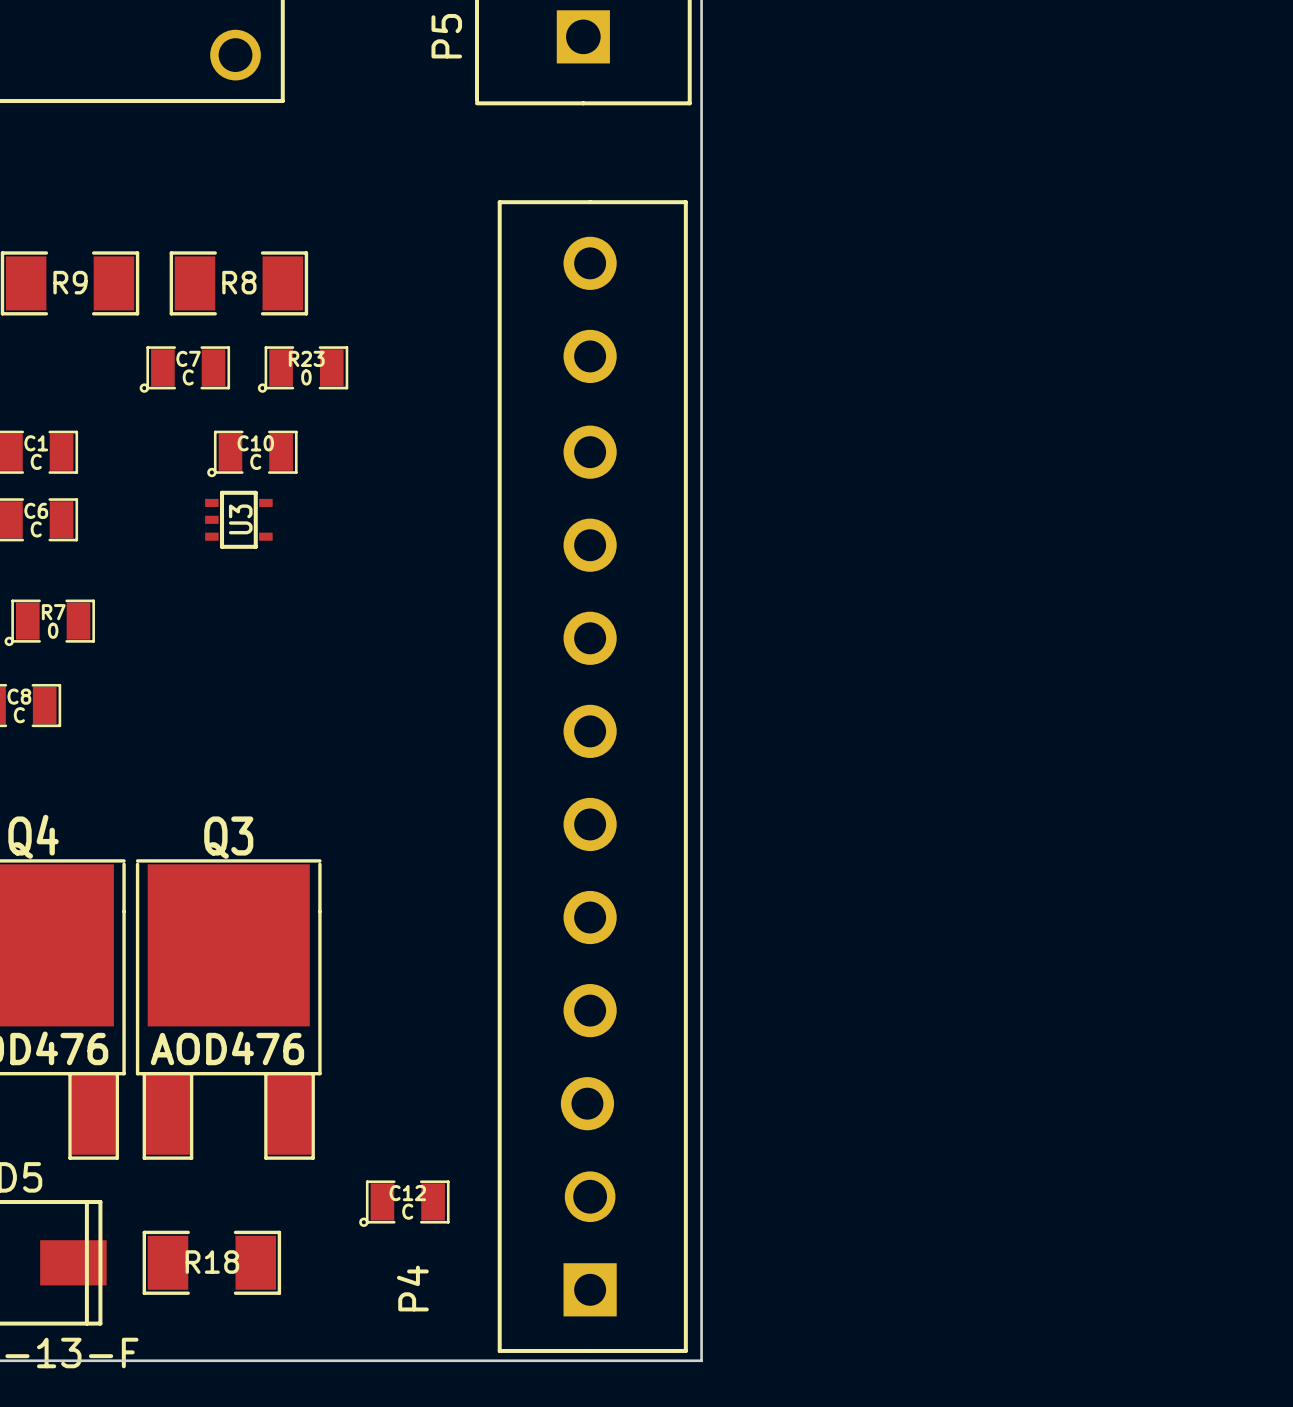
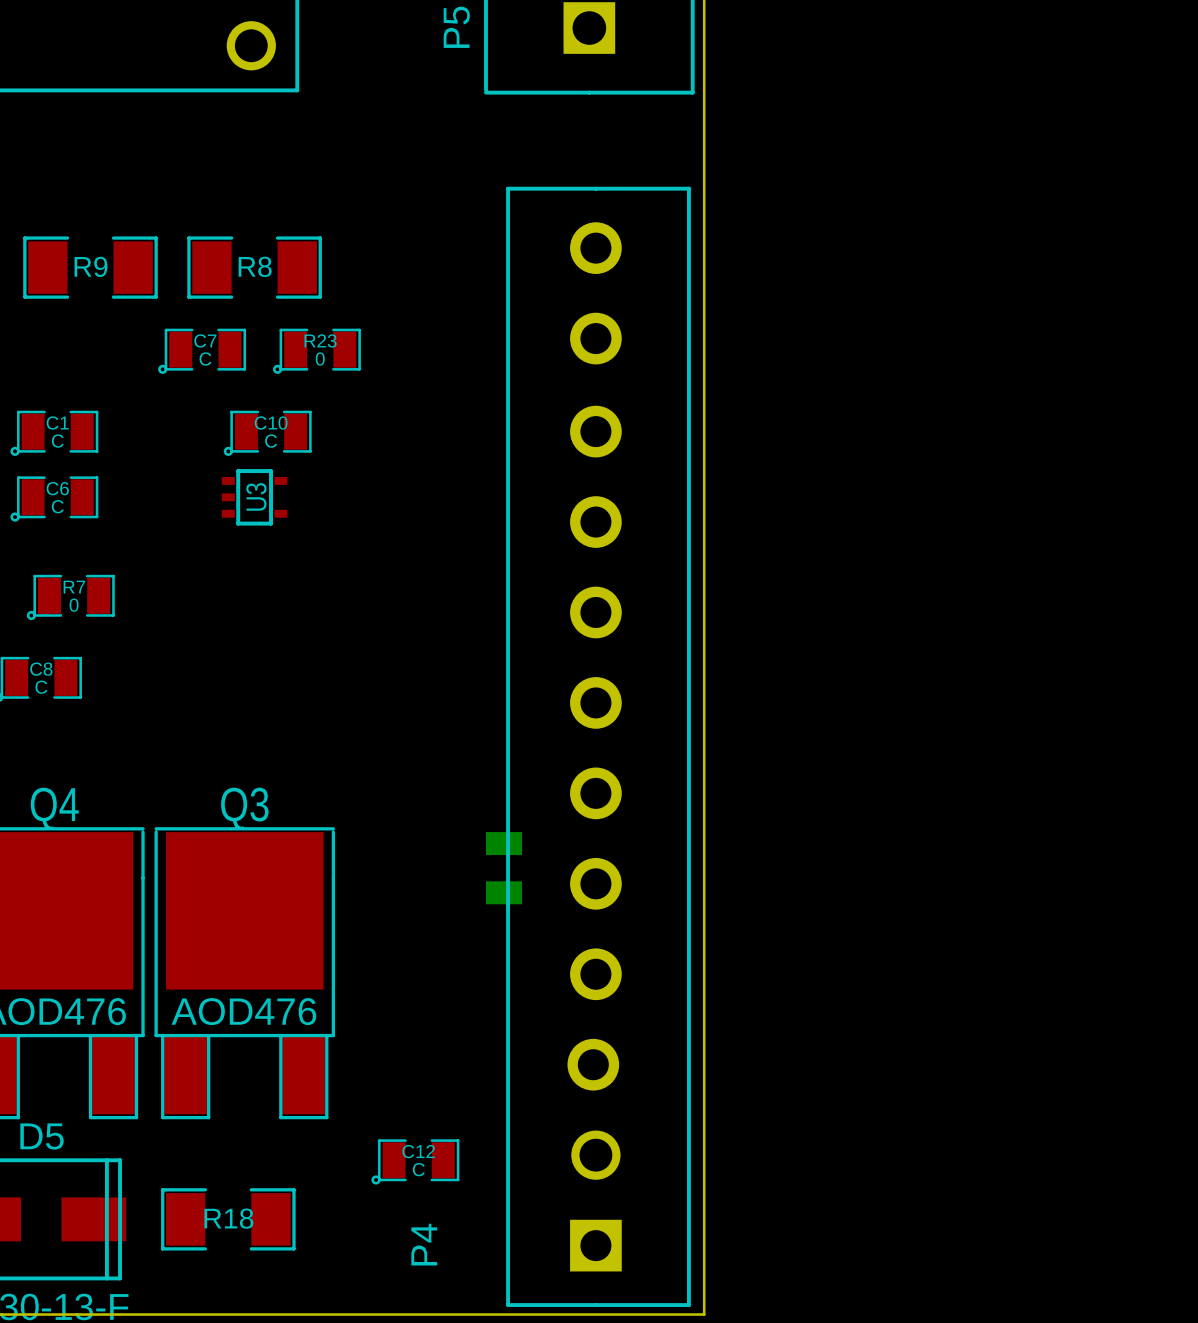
part: none -> (504, 868)

